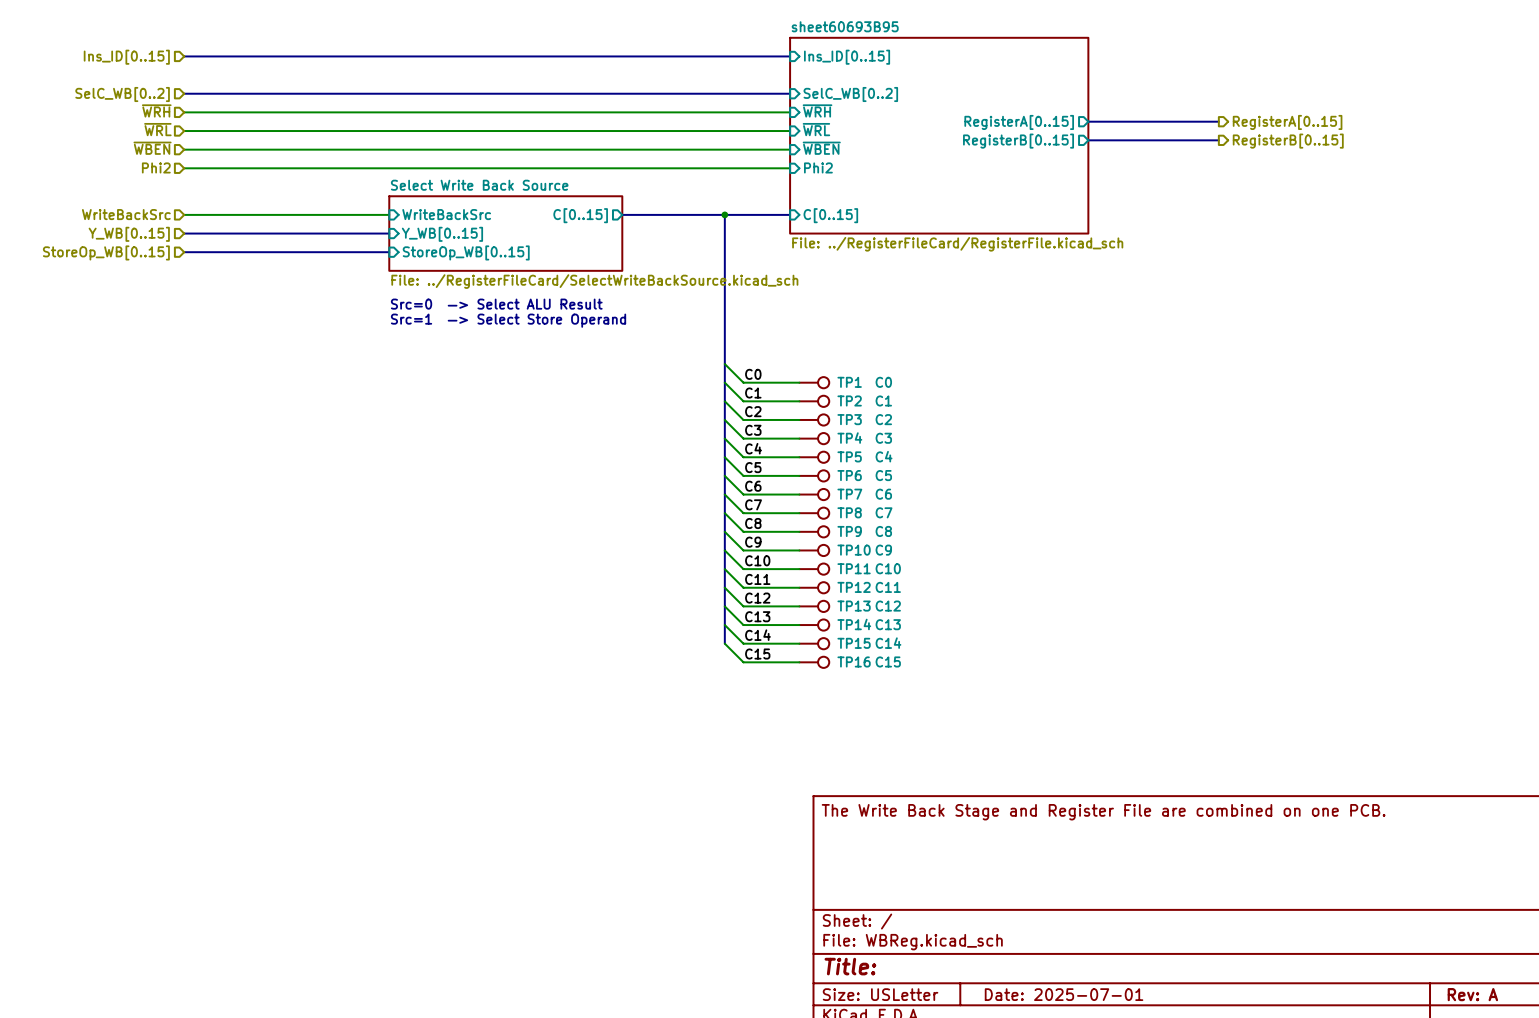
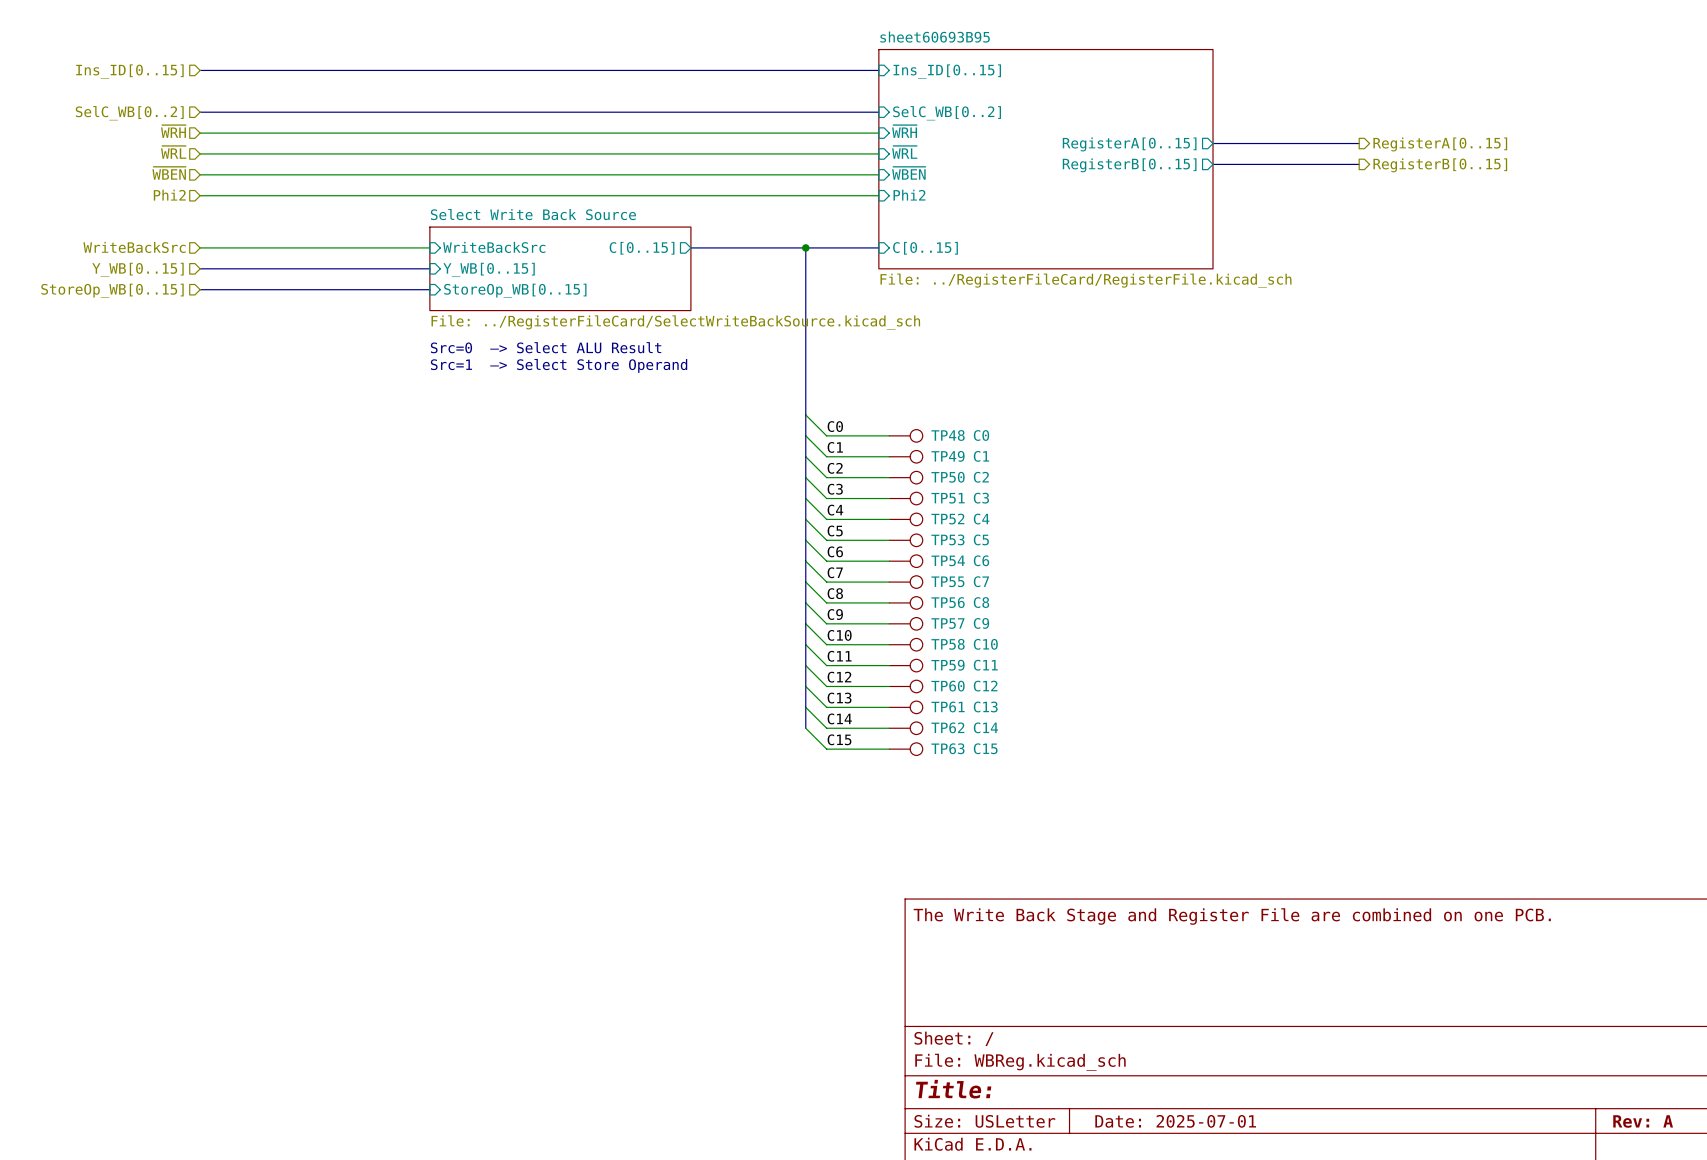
TP1 name: TP1 (849, 382) -> TP48 (948, 435)
TP2 name: TP2 (849, 400) -> TP49 (948, 456)
TP3 name: TP3 (849, 419) -> TP50 (948, 477)
TP4 name: TP4 (849, 438) -> TP51 (948, 498)
TP5 name: TP5 (849, 456) -> TP52 (947, 519)
TP6 name: TP6 (849, 475) -> TP53 (947, 539)
TP7 name: TP7 (849, 494) -> TP54 (948, 560)
TP8 name: TP8 (849, 512) -> TP55 (947, 581)
TP9 name: TP9 (849, 531) -> TP56 (948, 602)
TP10 name: TP10 (854, 550) -> TP57 (947, 623)
TP11 name: TP11 (854, 568) -> TP58 (948, 644)
TP12 name: TP12 (854, 587) -> TP59 (948, 665)
TP13 name: TP13 (854, 606) -> TP60 (948, 686)
TP14 name: TP14 (854, 624) -> TP61 (948, 706)
TP15 name: TP15 (854, 643) -> TP62 (947, 727)
TP16 name: TP16 (854, 661) -> TP63 (947, 748)

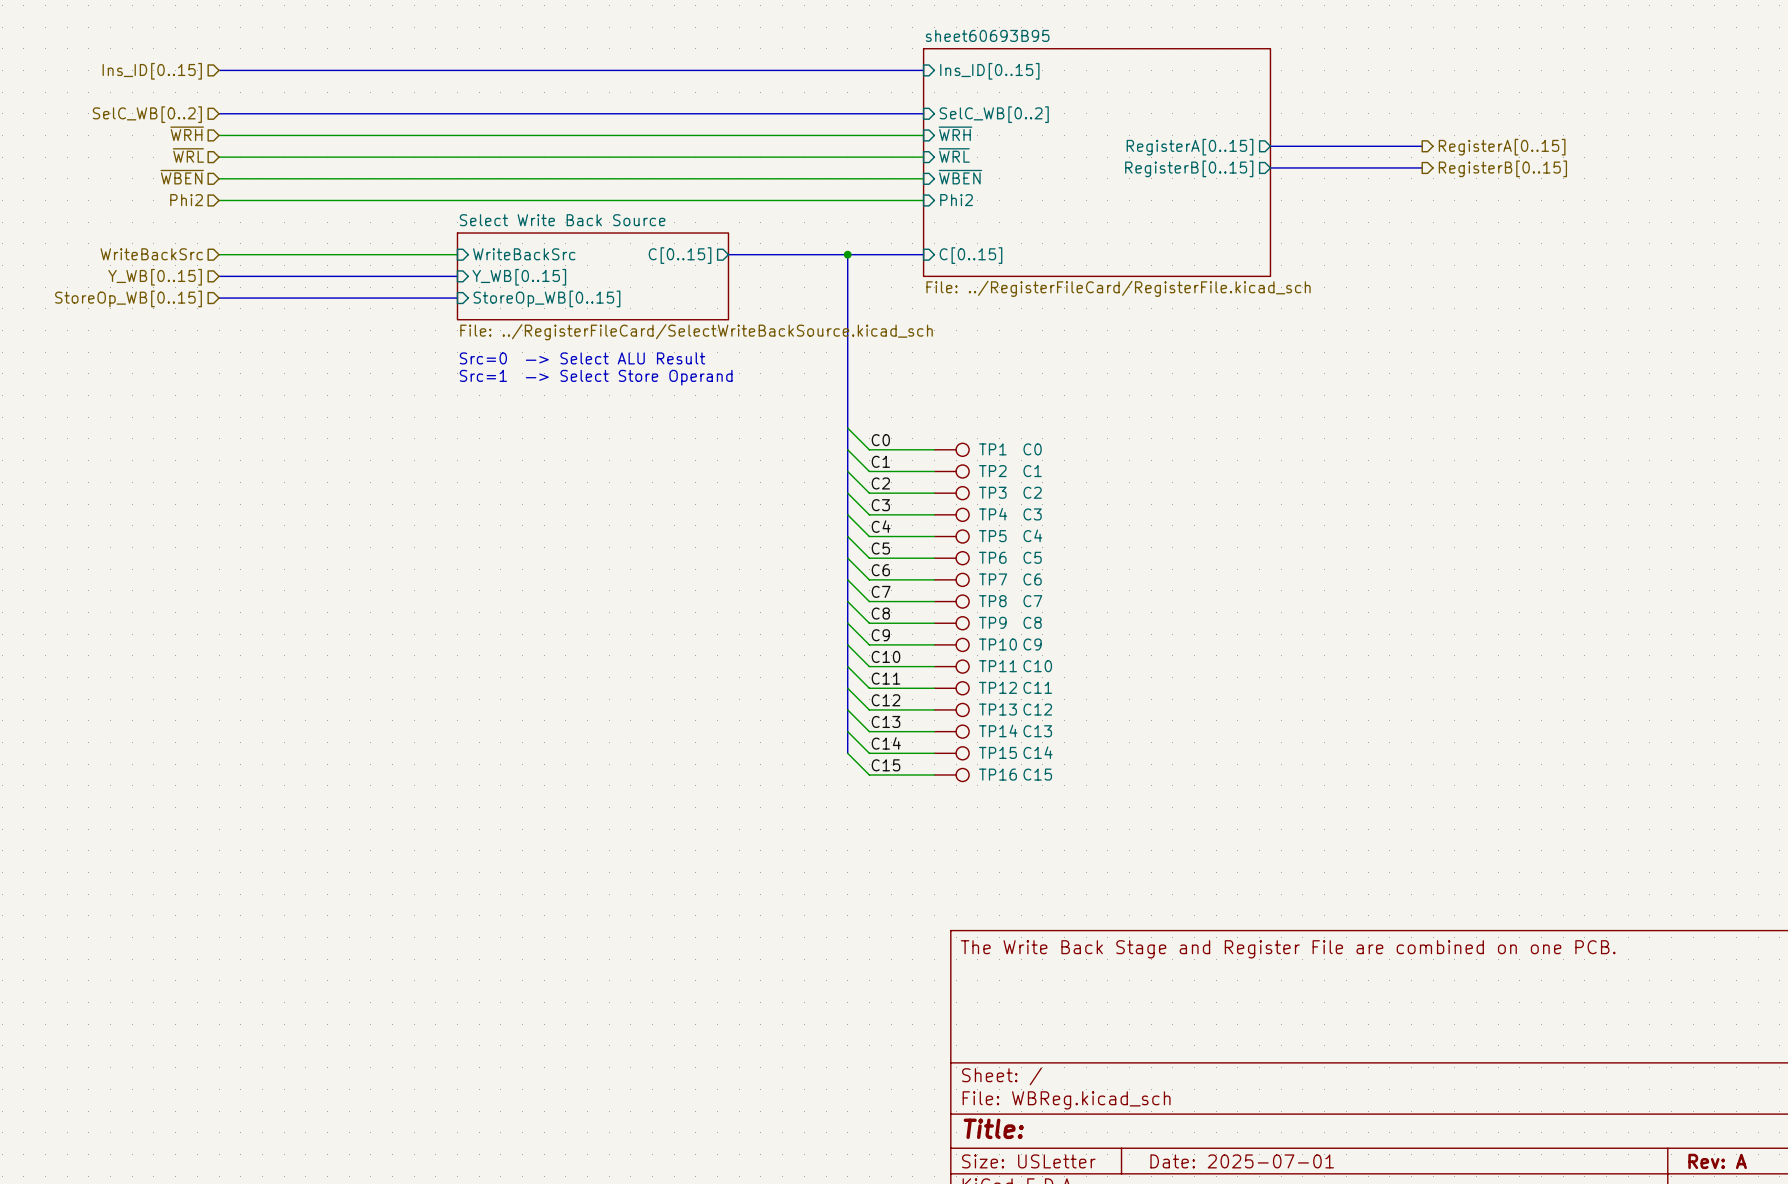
TP48 name: TP48 (948, 435) -> TP1 (992, 449)
TP49 name: TP49 (948, 456) -> TP2 (992, 471)
TP50 name: TP50 (948, 477) -> TP3 (992, 492)
TP51 name: TP51 (948, 498) -> TP4 (993, 514)
TP52 name: TP52 (947, 519) -> TP5 (992, 536)
TP53 name: TP53 (947, 539) -> TP6 (992, 557)
TP54 name: TP54 (948, 560) -> TP7 (993, 579)
TP55 name: TP55 (947, 581) -> TP8 (992, 601)
TP56 name: TP56 (948, 602) -> TP9 (992, 622)
TP57 name: TP57 (947, 623) -> TP10 (998, 644)
TP58 name: TP58 (948, 644) -> TP11 (998, 666)
TP59 name: TP59 (948, 665) -> TP12 (998, 687)
TP60 name: TP60 (948, 686) -> TP13 (998, 709)
TP61 name: TP61 (948, 706) -> TP14 (998, 730)
TP62 name: TP62 (947, 727) -> TP15 (998, 752)
TP63 name: TP63 (947, 748) -> TP16 (998, 774)

